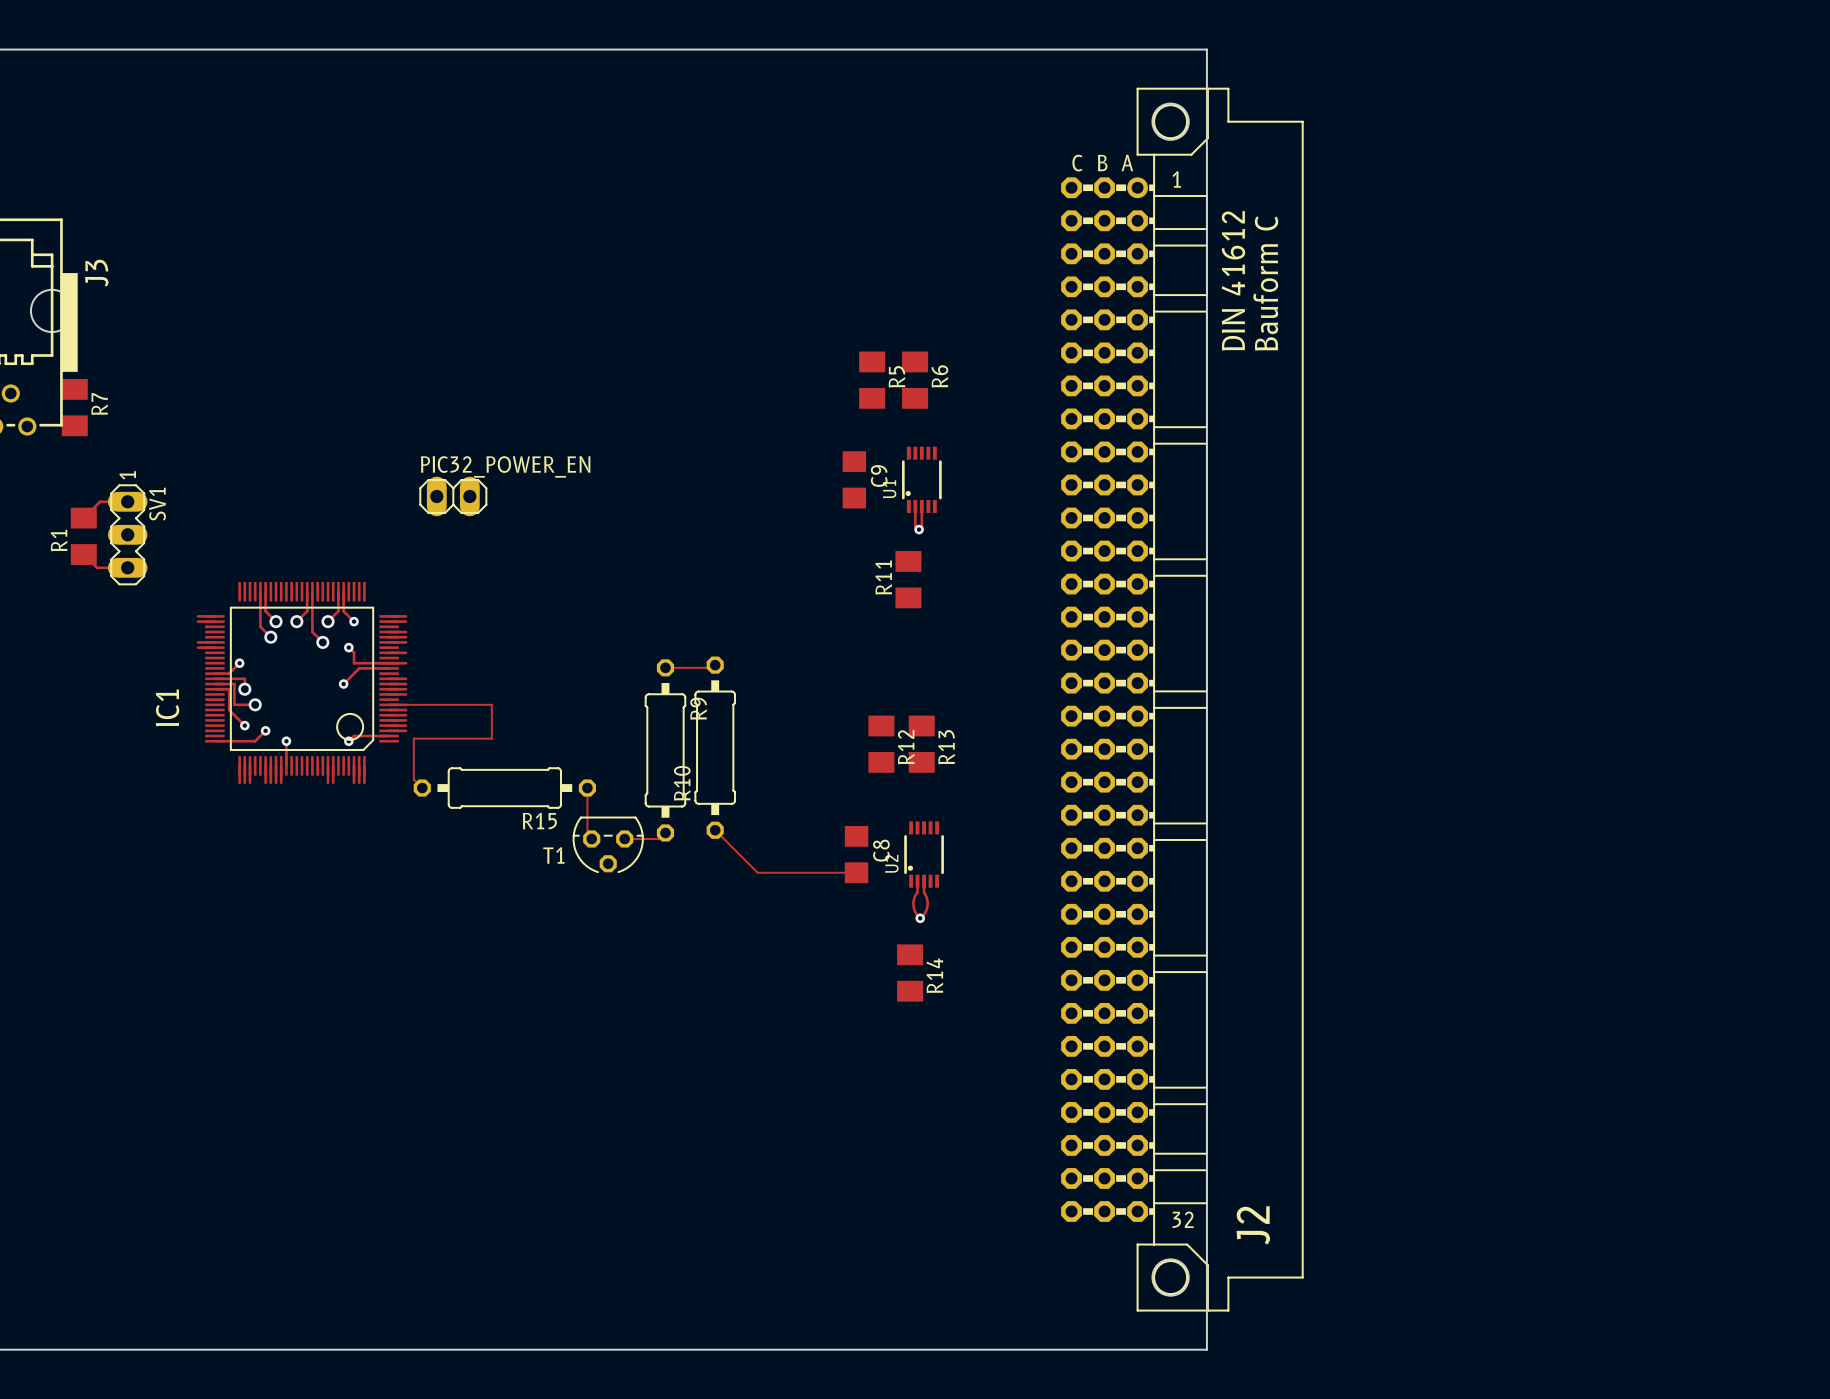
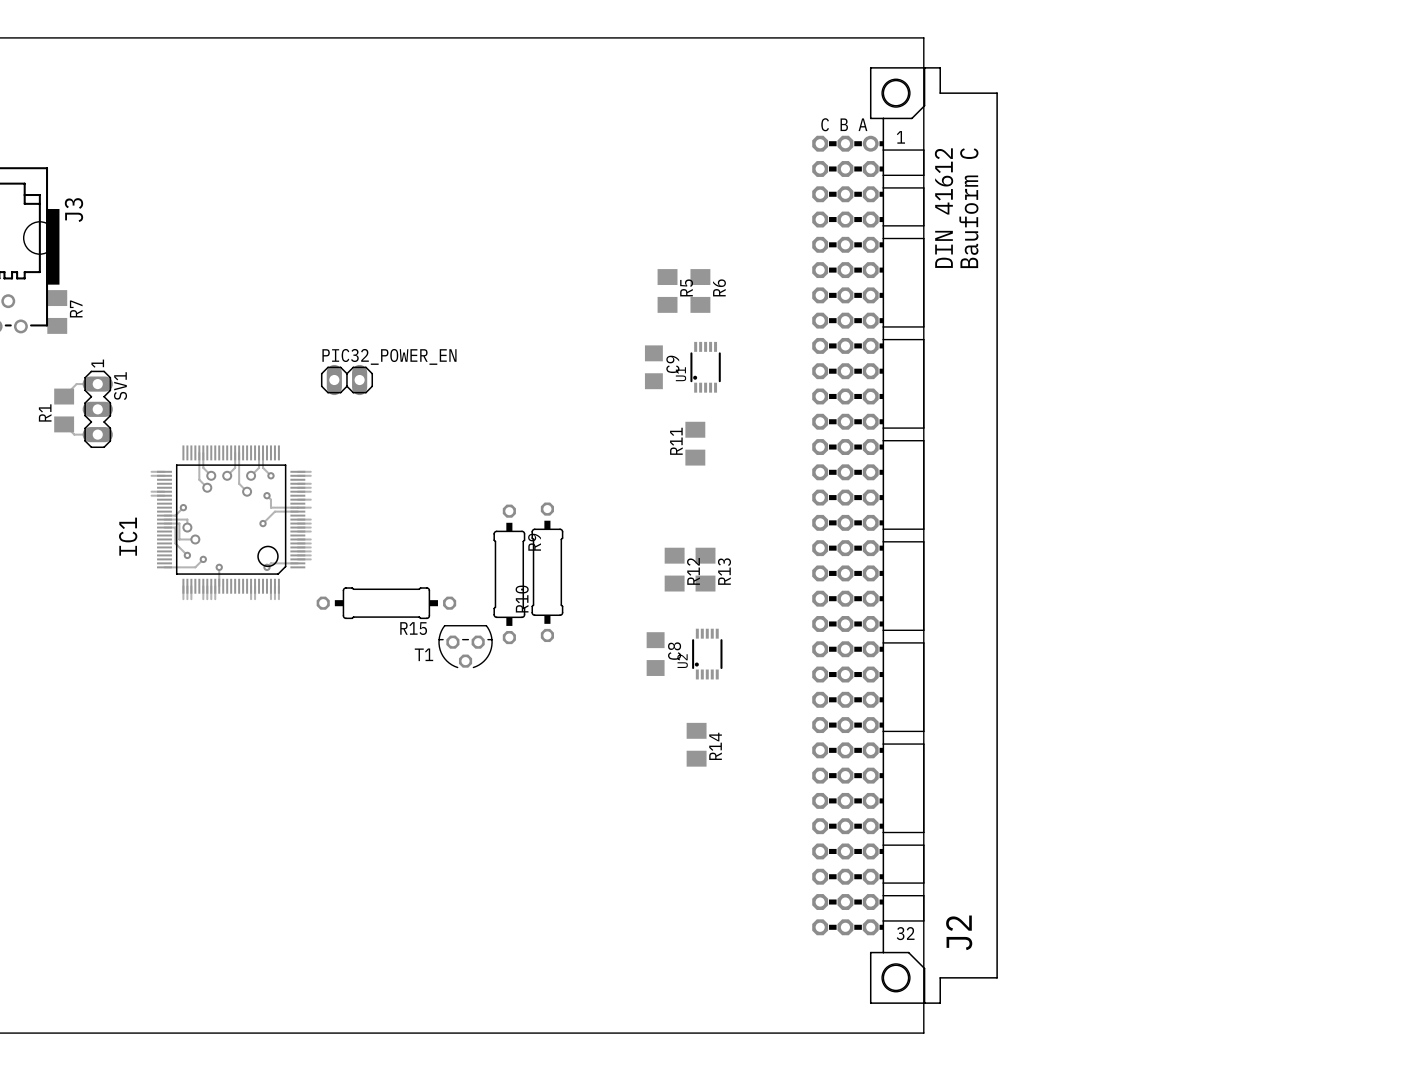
track: (915, 506) (915, 526) (919, 529) (921, 527) (921, 506) -> none
via: (919, 529) -> none
track: (715, 665) (712, 667) (665, 667) -> none
track: (406, 704) (491, 704) (491, 738) (413, 738) (413, 779) (422, 788) -> none
track: (587, 788) (587, 834) (591, 838) -> none
track: (715, 830) (757, 872) (856, 872) -> none
track: (665, 832) (659, 838) (624, 838) -> none
track: (917, 881) (917, 892) (913, 905) (920, 918) (927, 906) (924, 892) (924, 881) -> none
via: (920, 918) -> none

